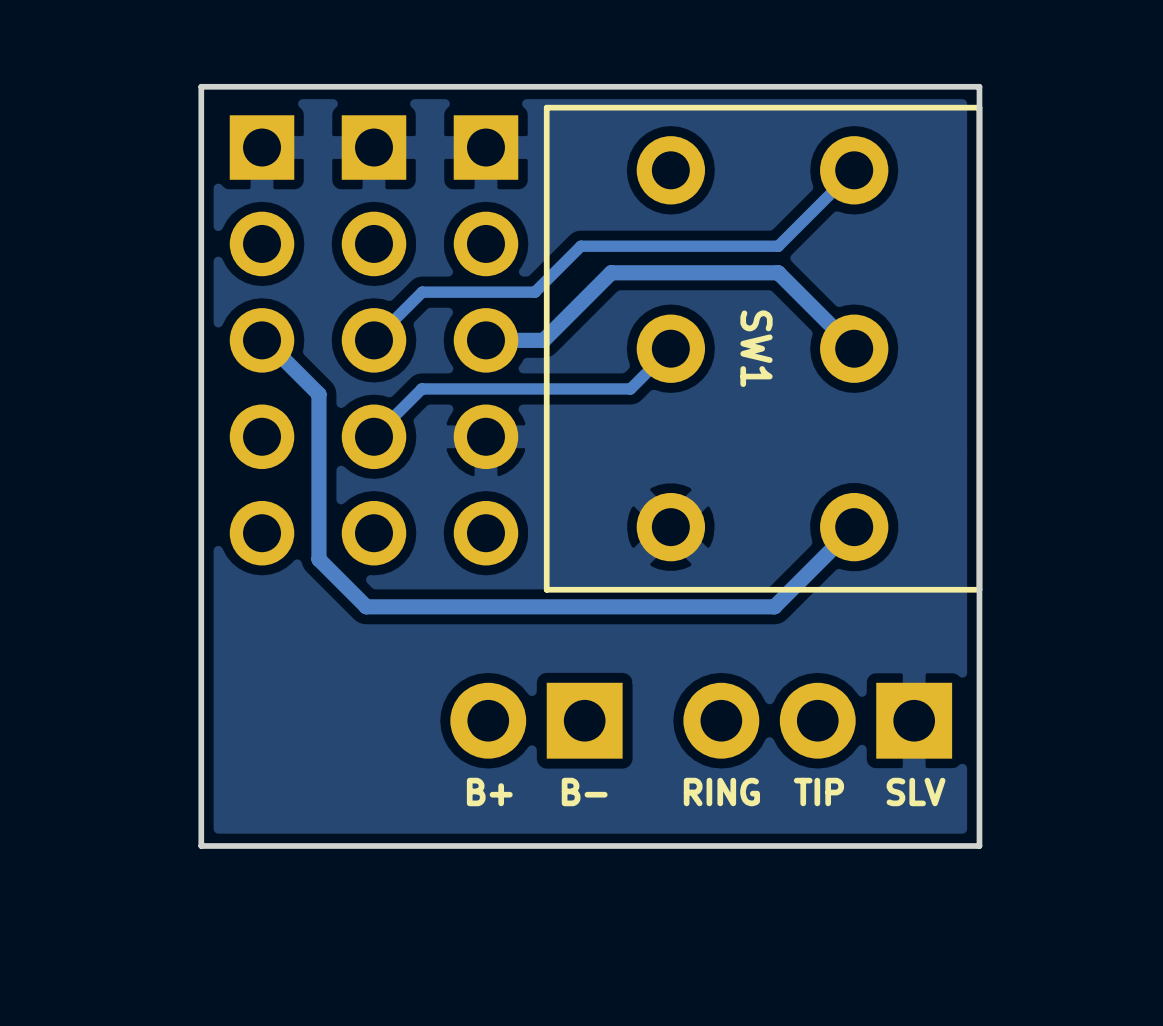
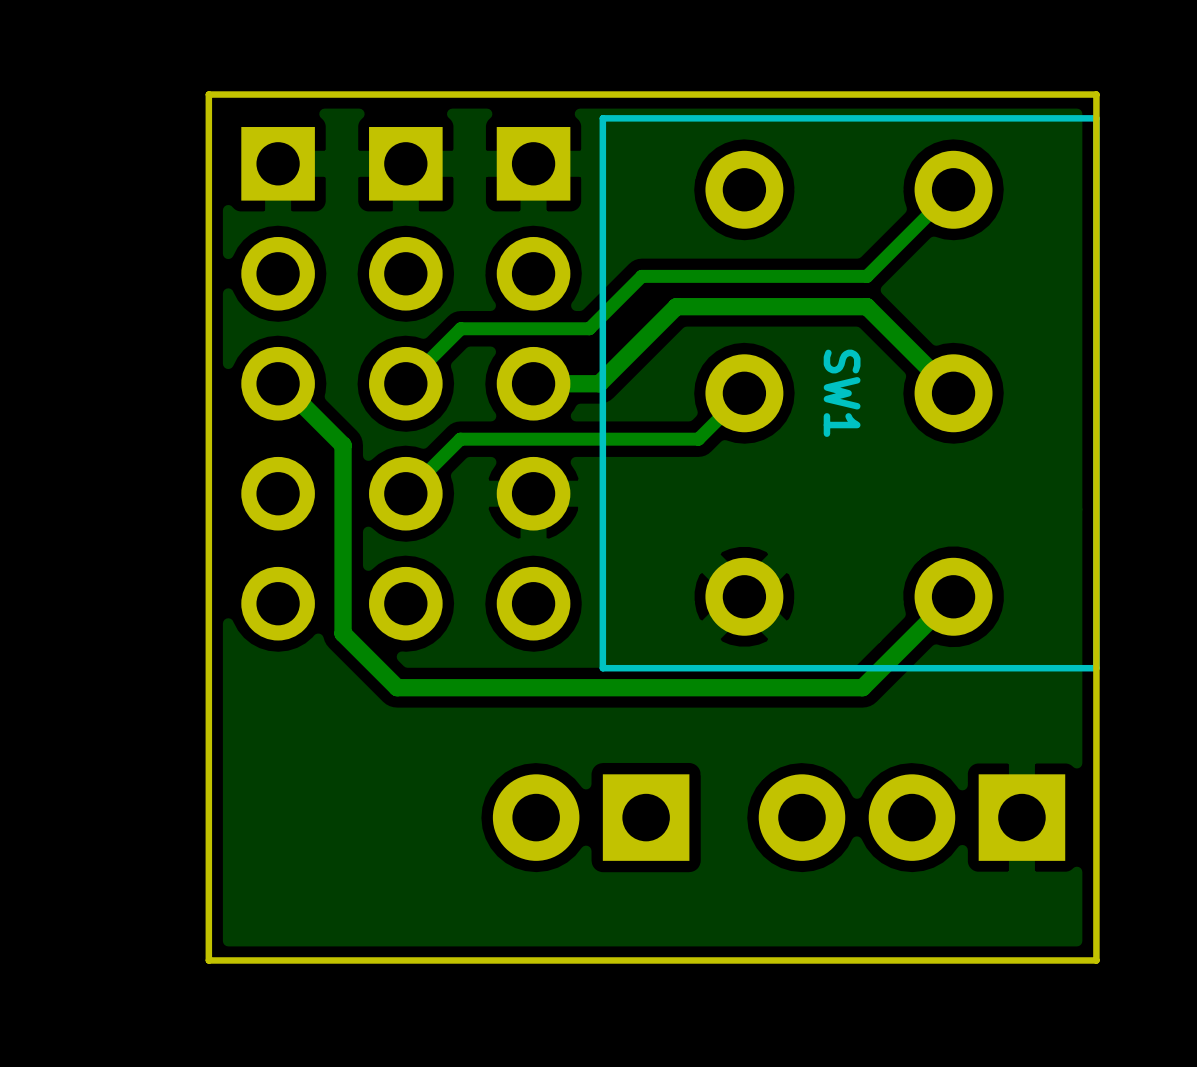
text: B+ (489, 792) -> none
text: B- (584, 792) -> none
text: RING (721, 792) -> none
text: TIP (818, 792) -> none
text: SLV (916, 792) -> none

